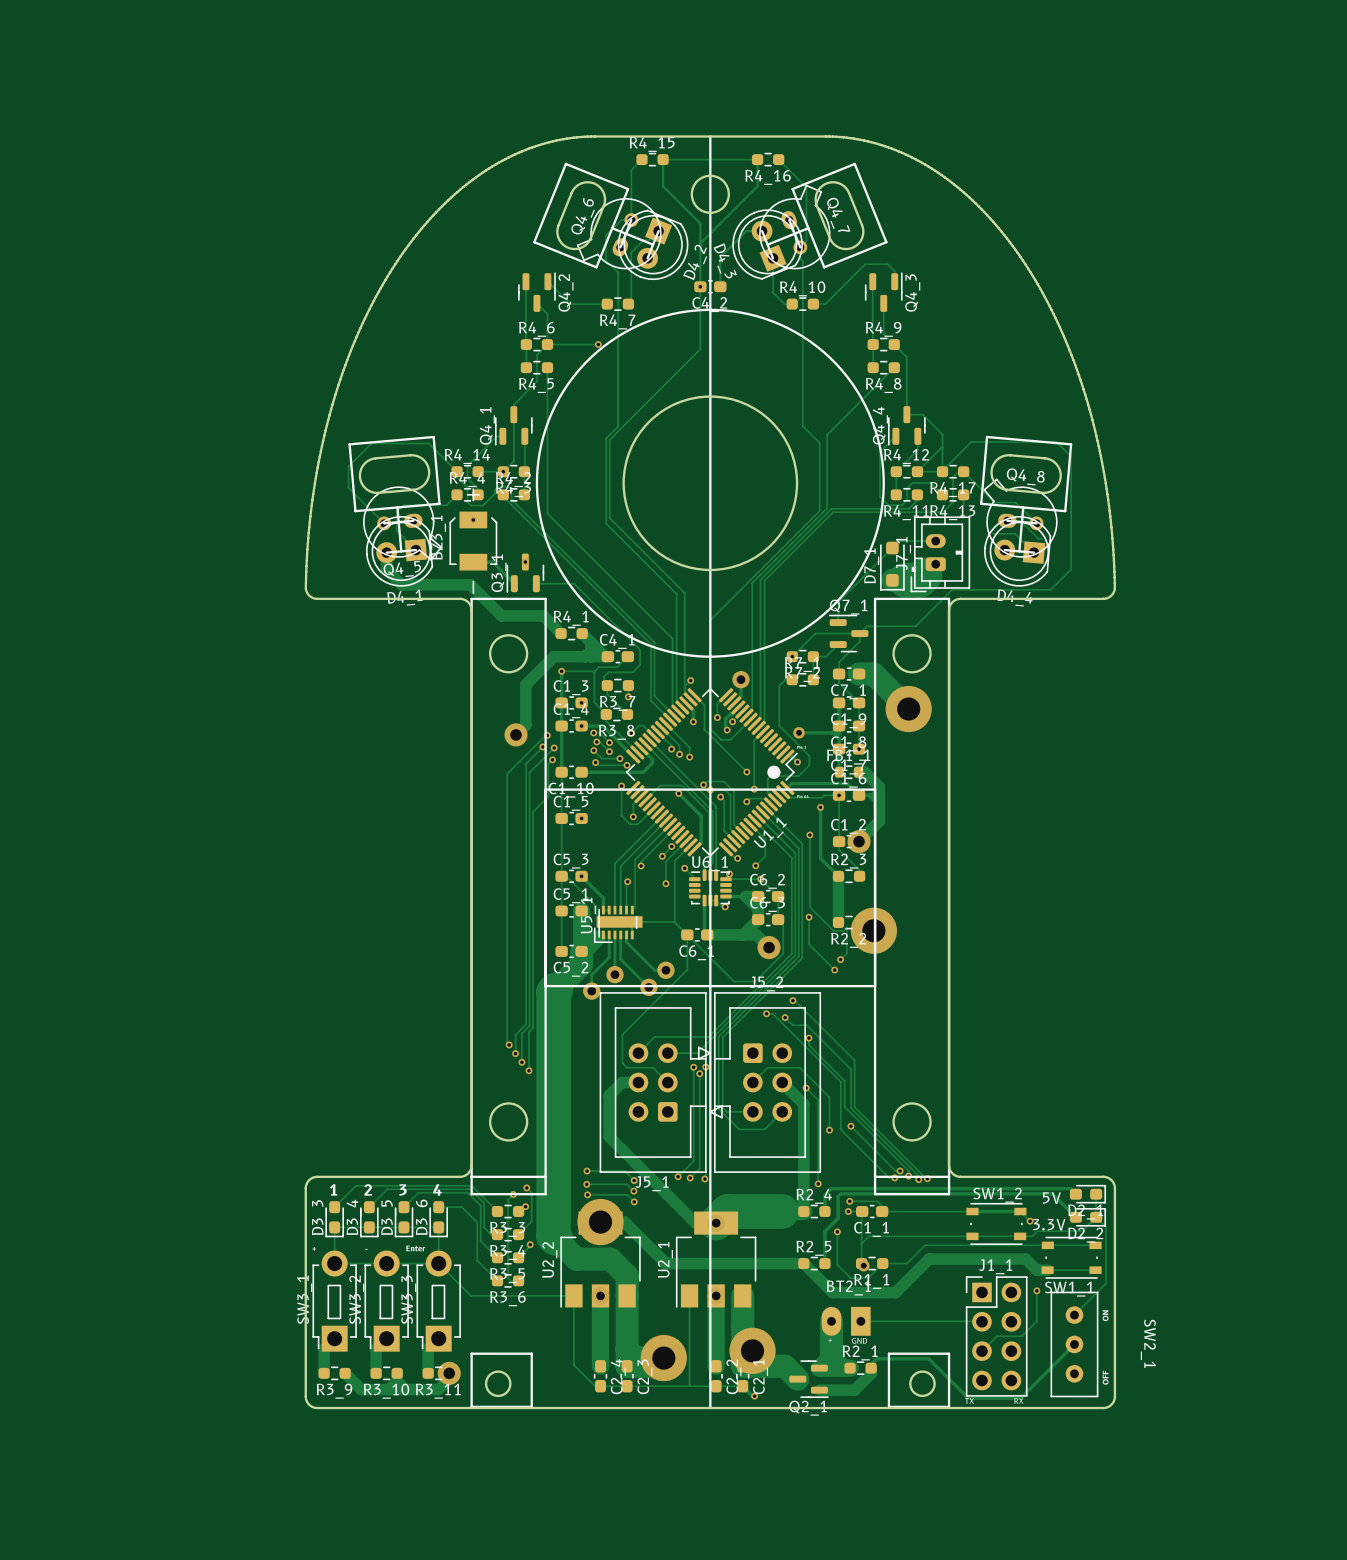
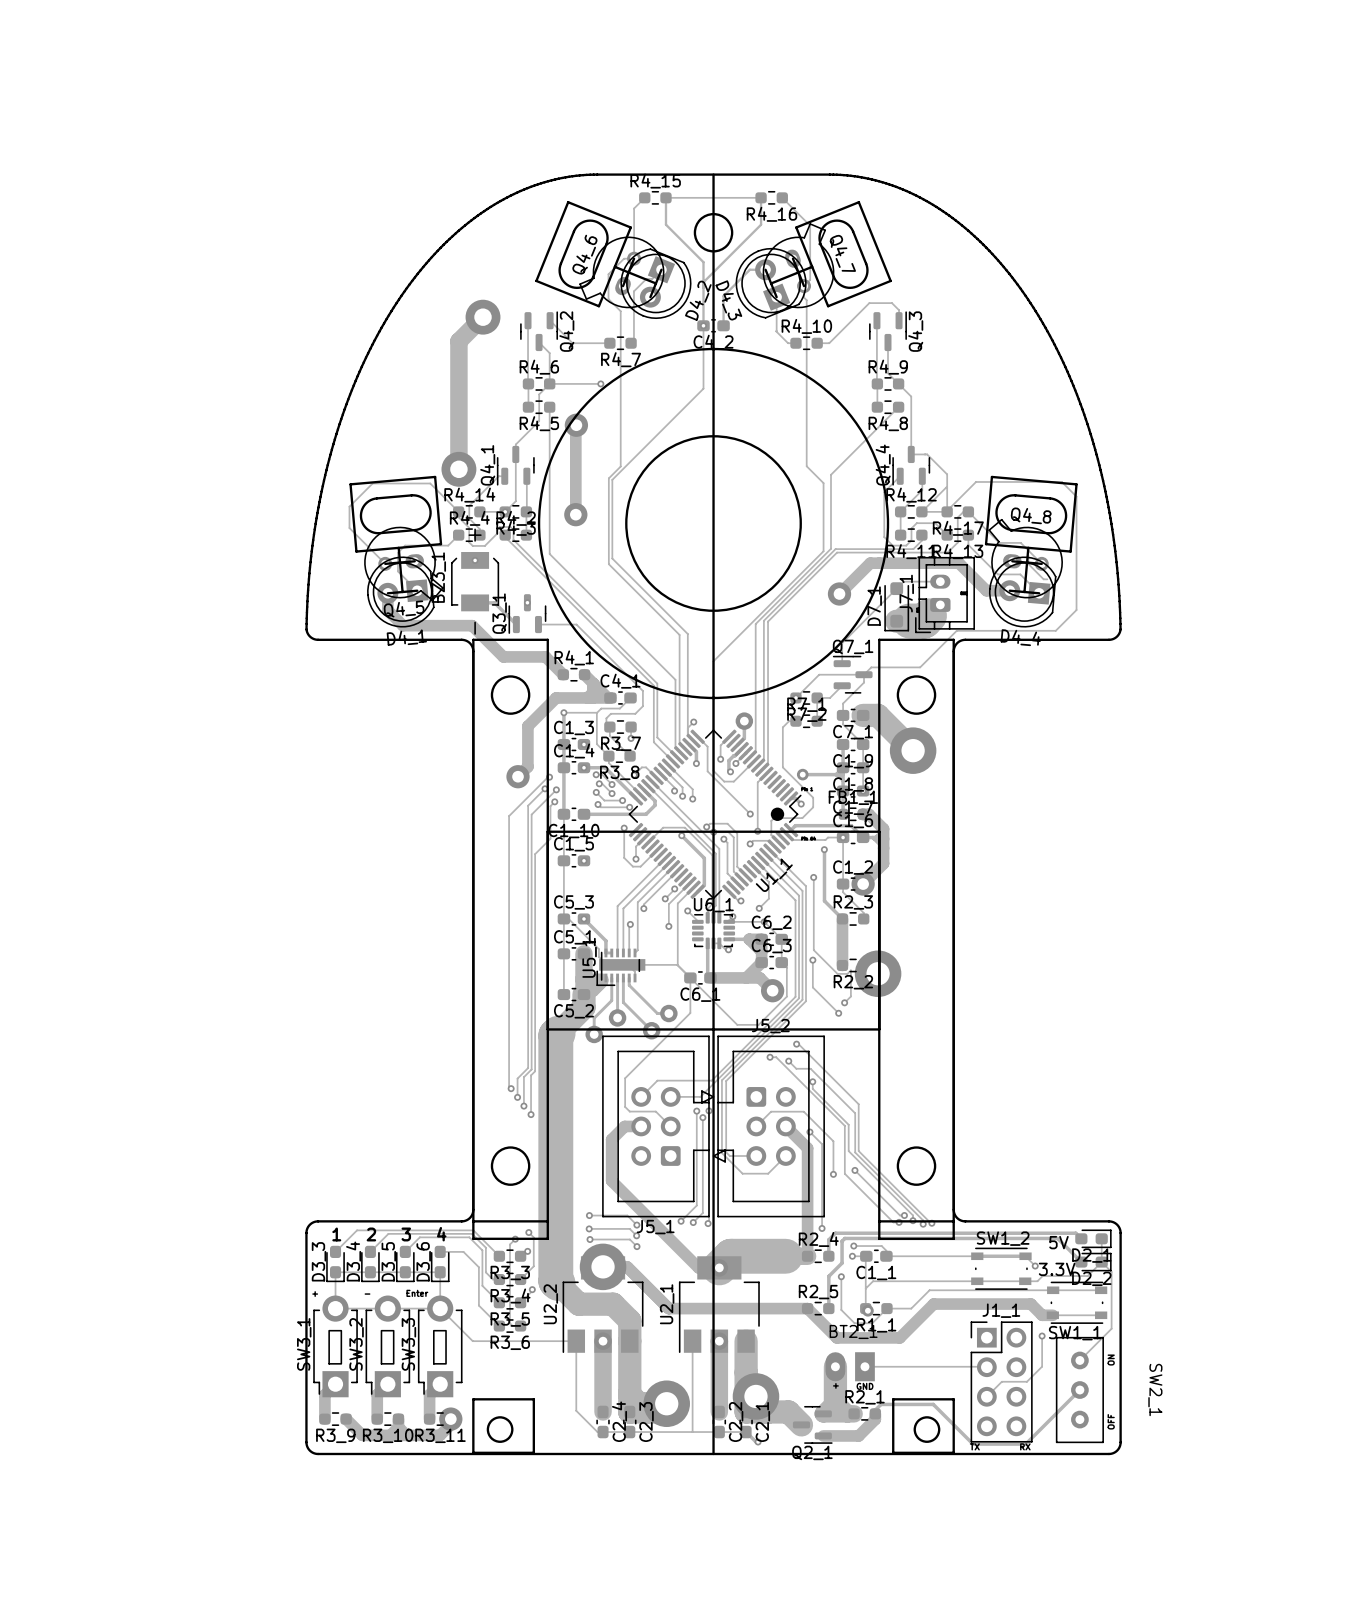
track: none -> (483, 317) (458, 341) (458, 469)
via: none -> (483, 317)
track: none -> (576, 425) (575, 514)
via: none -> (576, 425)
via: none -> (458, 469)
via: none -> (575, 514)
track: none -> (968, 544) (997, 574)
track: none -> (1009, 590) (986, 590) (958, 563) (870, 563) (839, 593)
via: none -> (839, 593)

